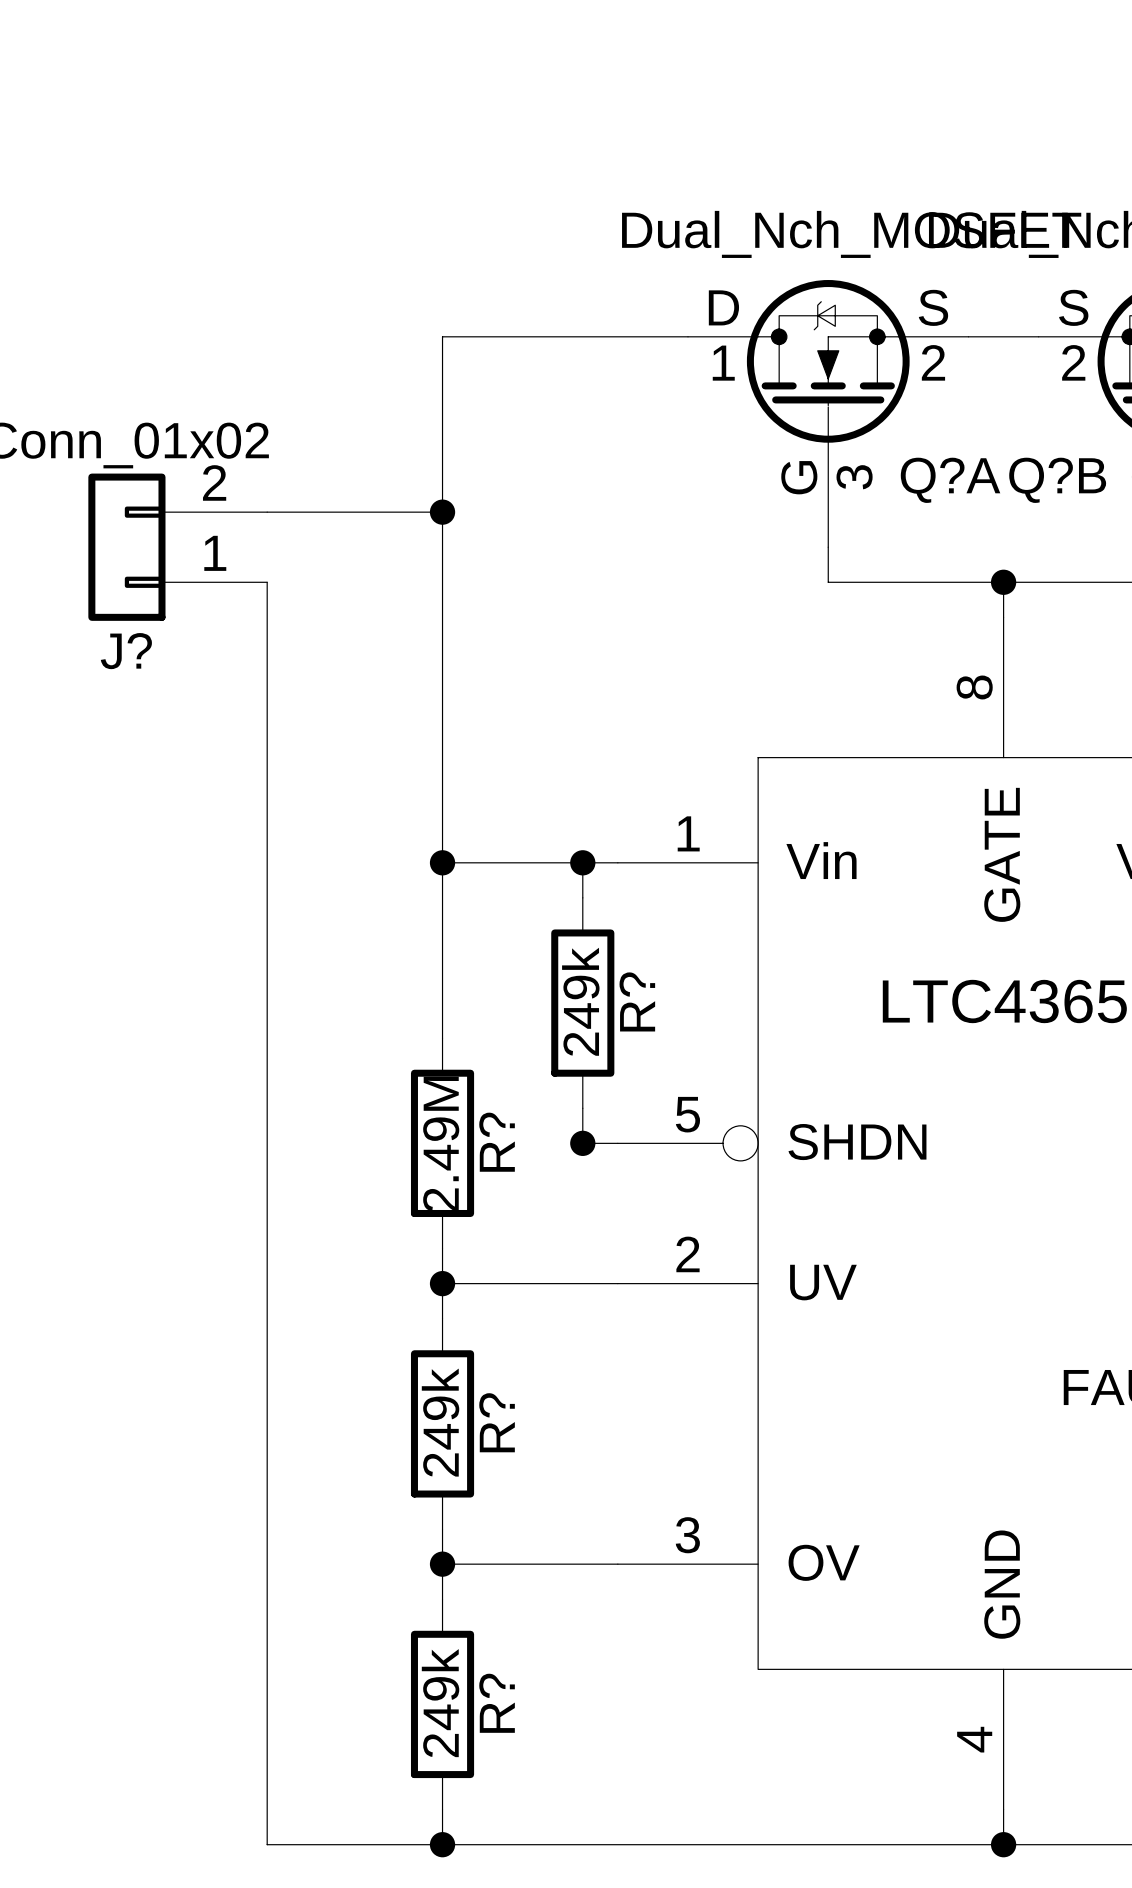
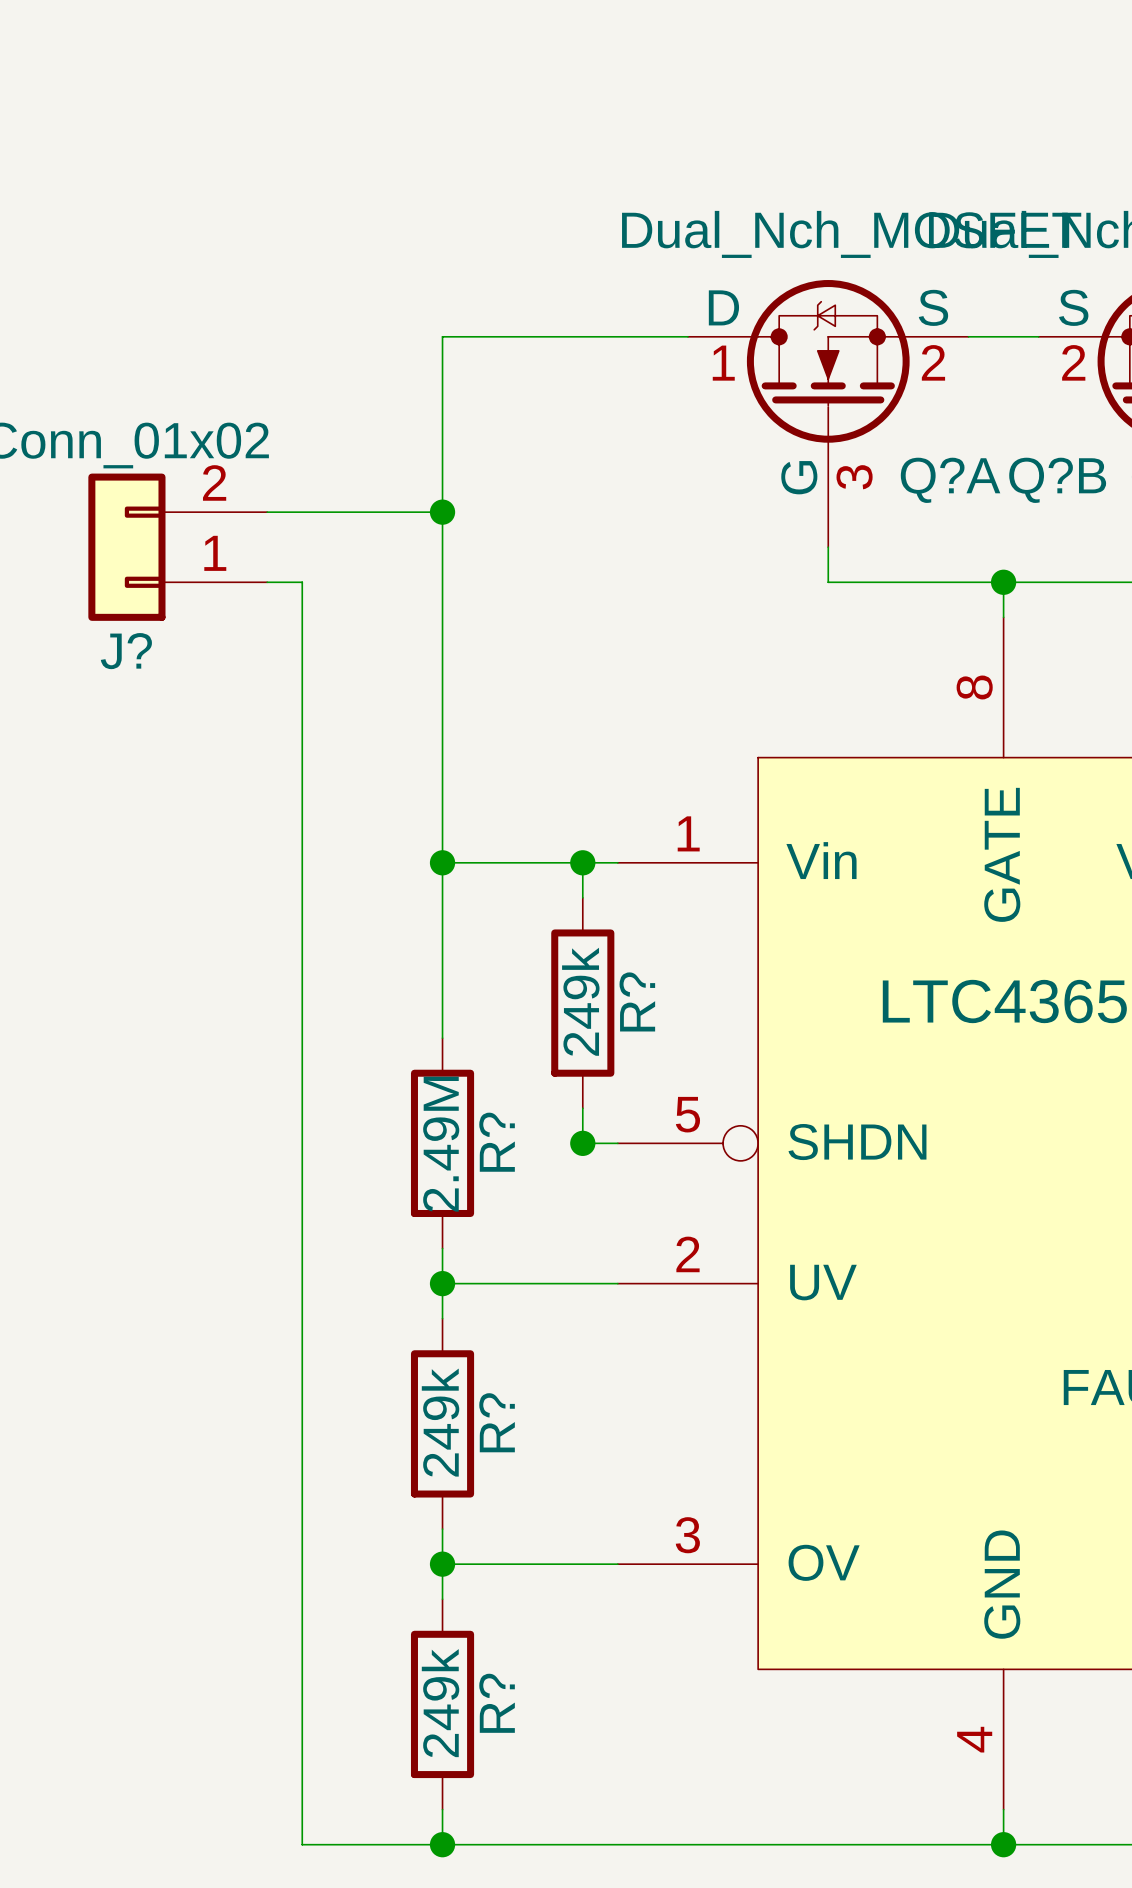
wire: (267, 582) (267, 1844) (302, 1844) -> (267, 582) (302, 582) (302, 1844)

